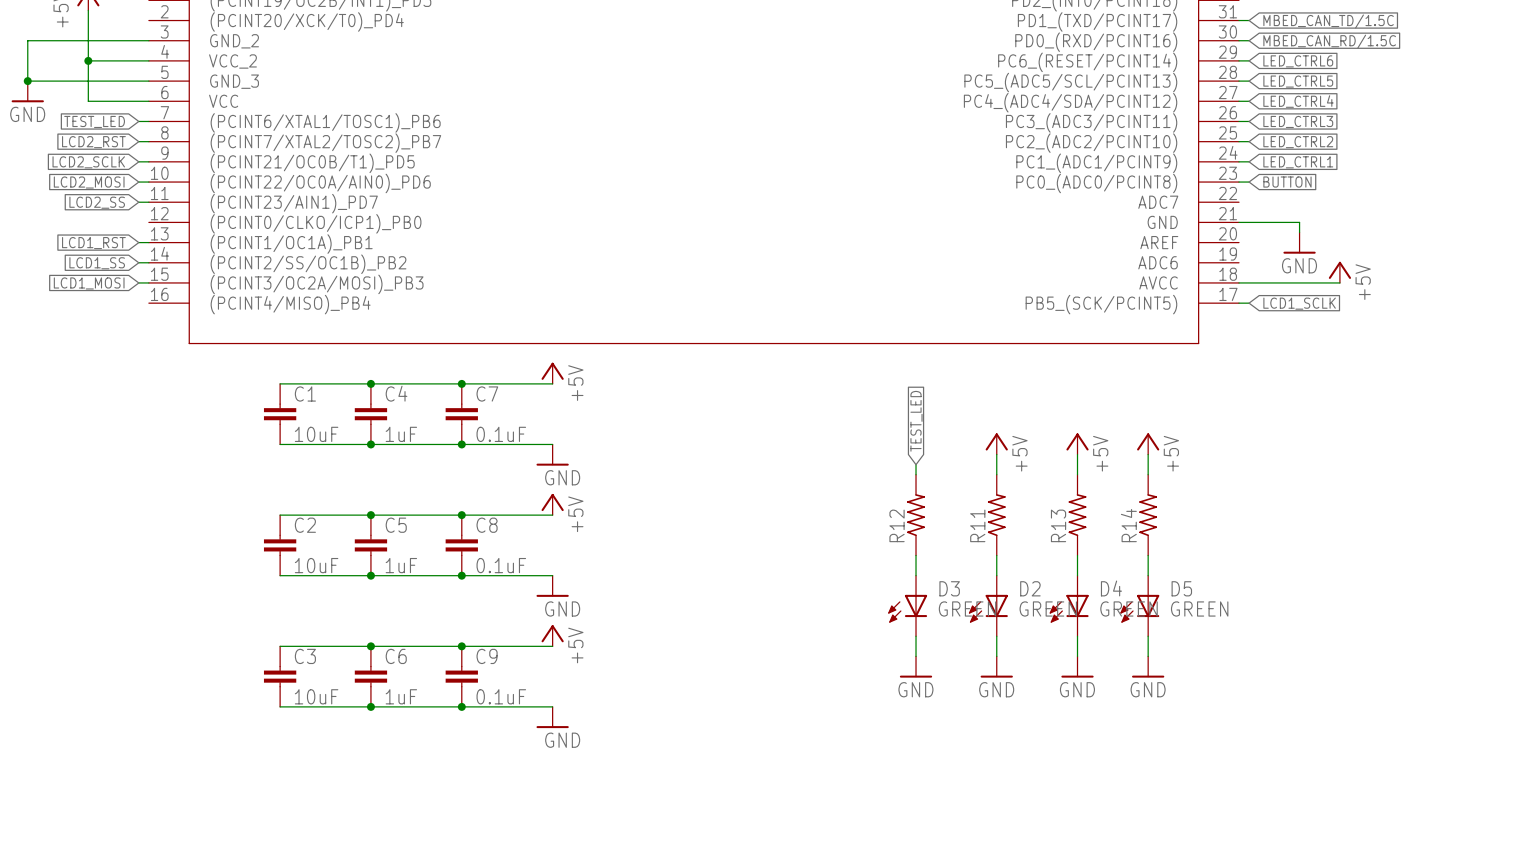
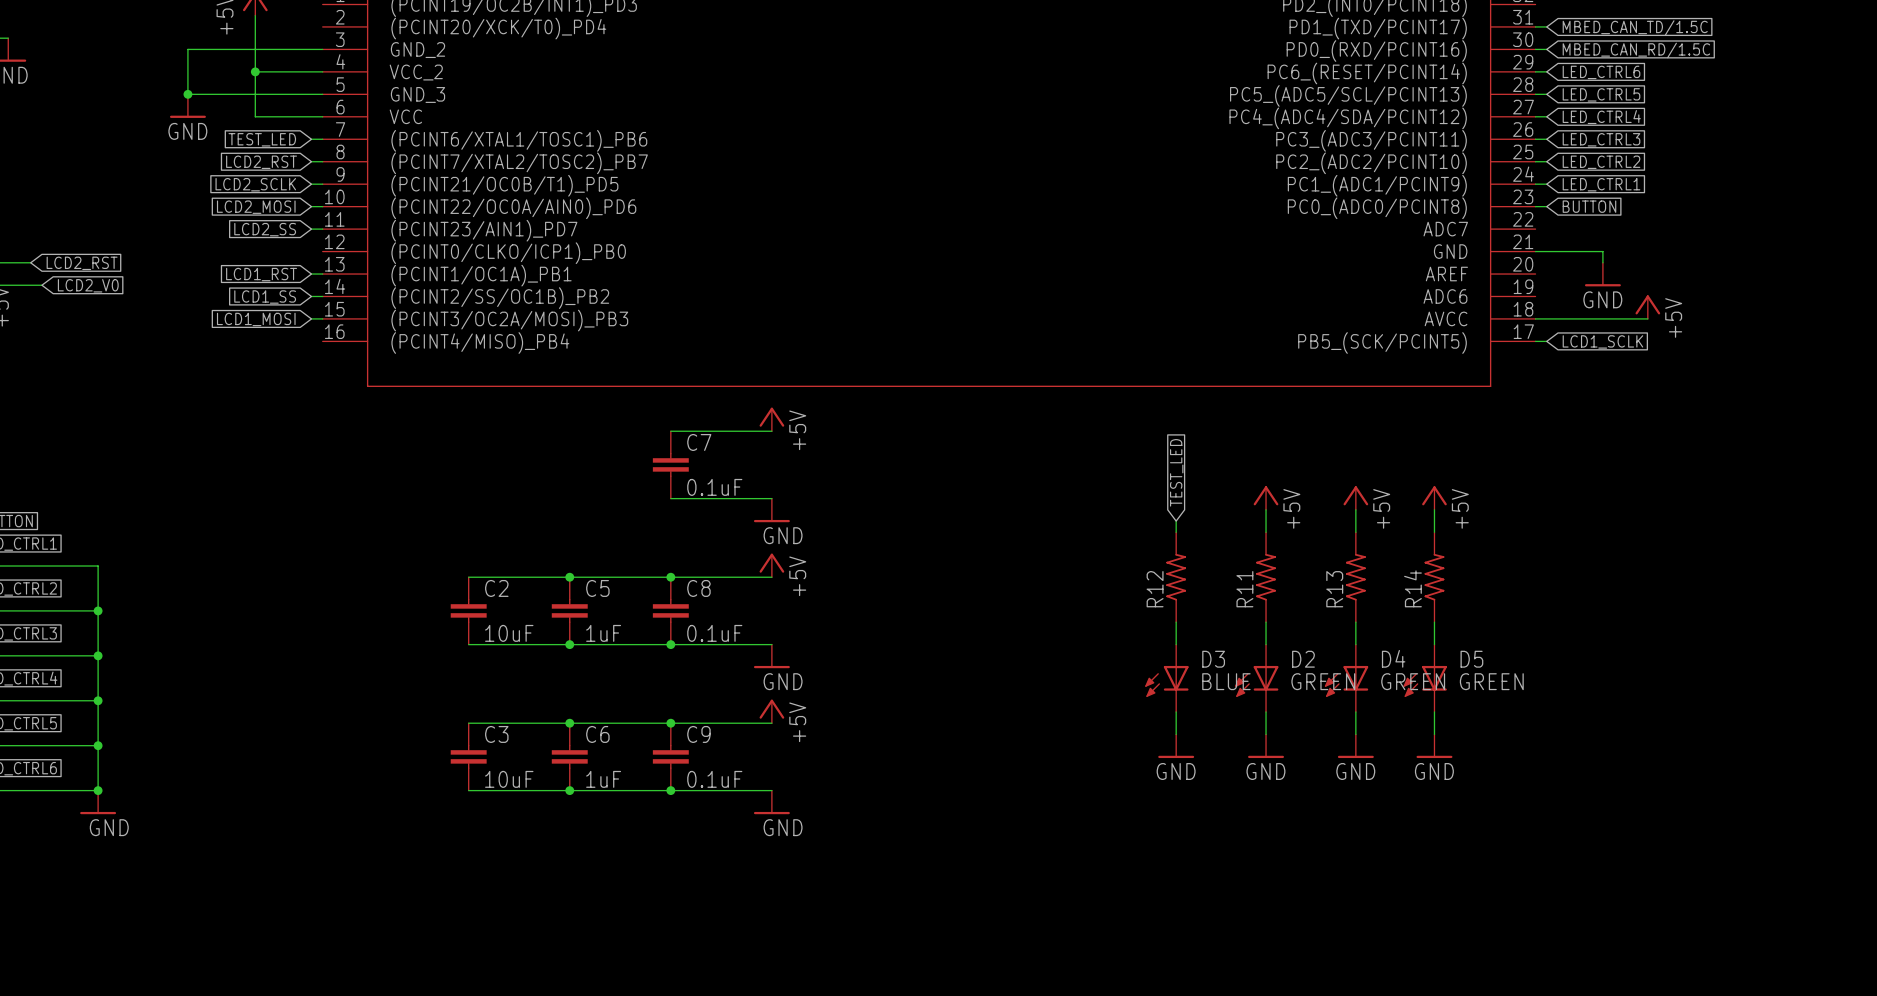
wire: (280, 383) (461, 383) -> none
junction: (370, 383) -> none
junction: (461, 383) -> none
C1: 10uF (280, 414) -> none
C4: 1uF (370, 414) -> none
wire: (280, 444) (461, 444) -> none
junction: (370, 444) -> none
junction: (461, 444) -> none
D3 value: GREEN (967, 608) -> BLUE (1226, 681)

